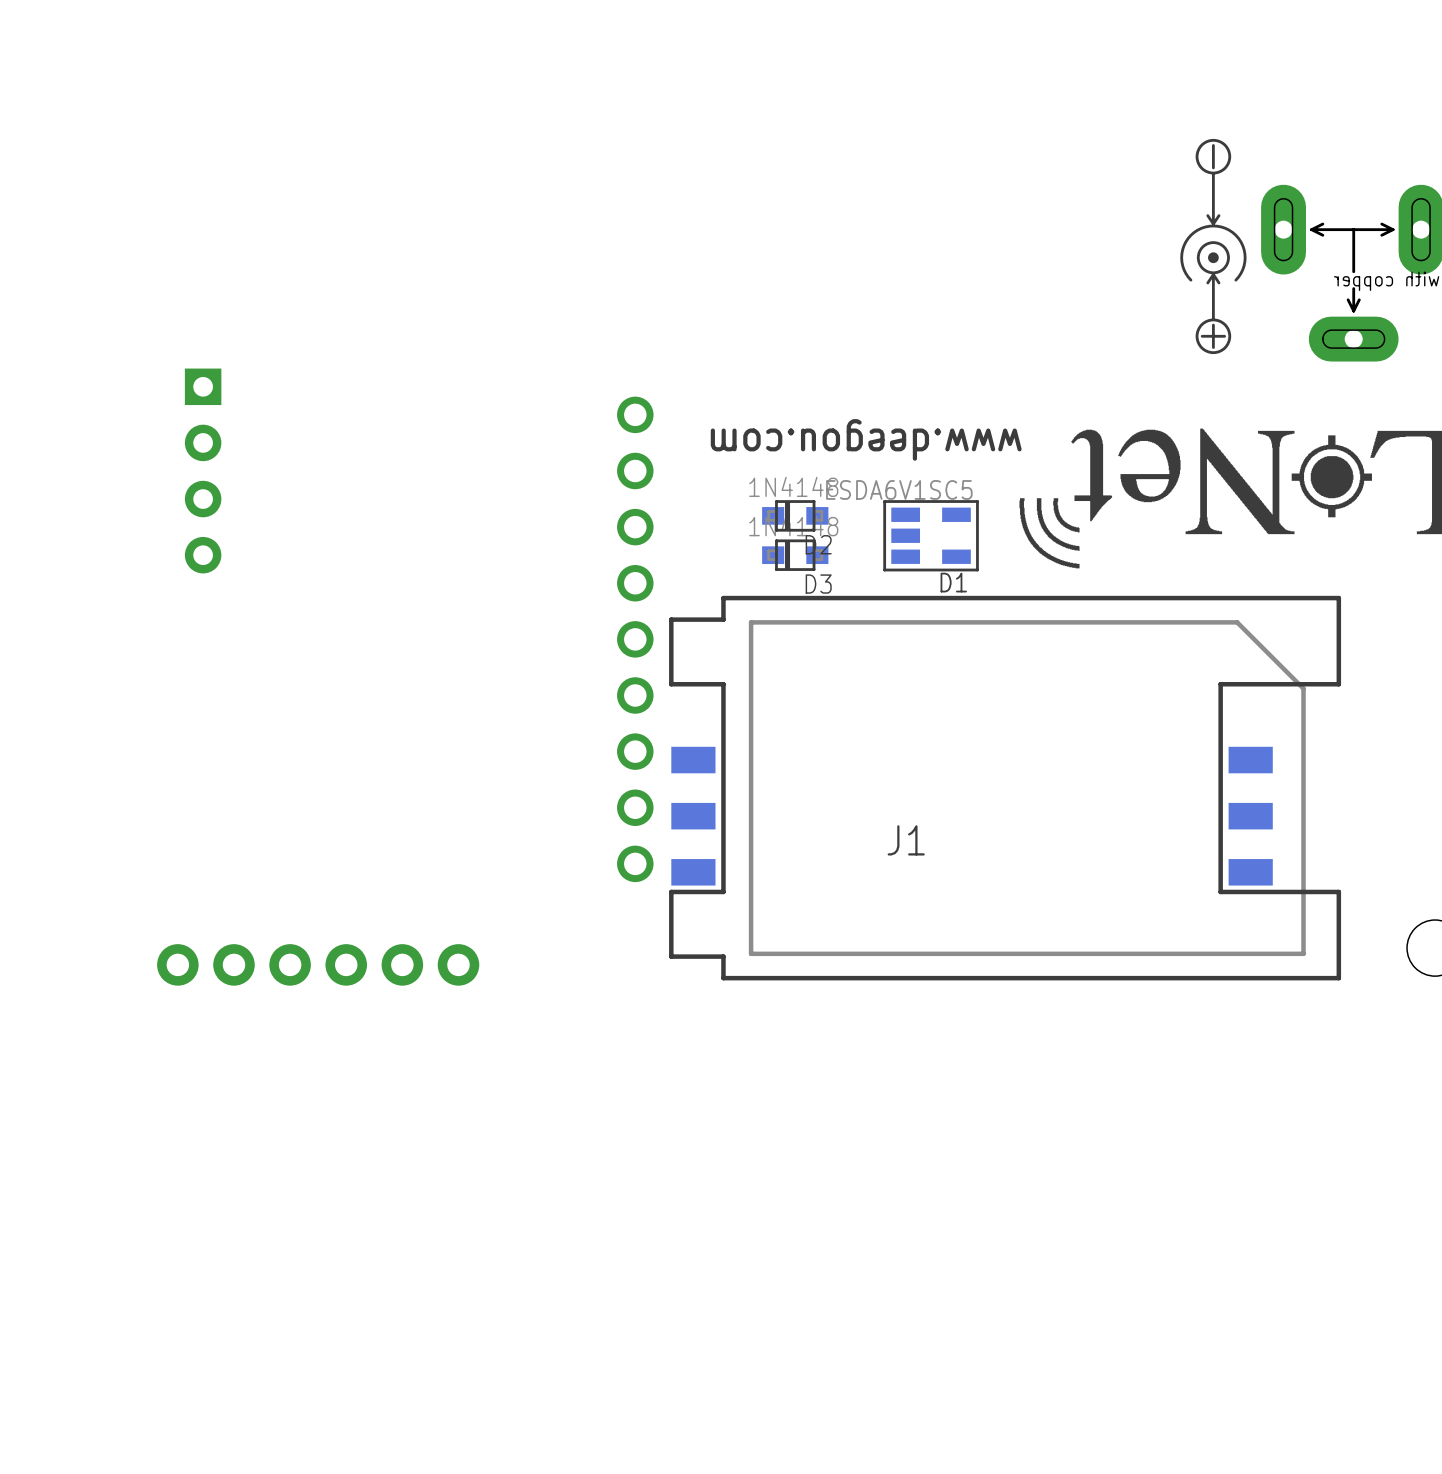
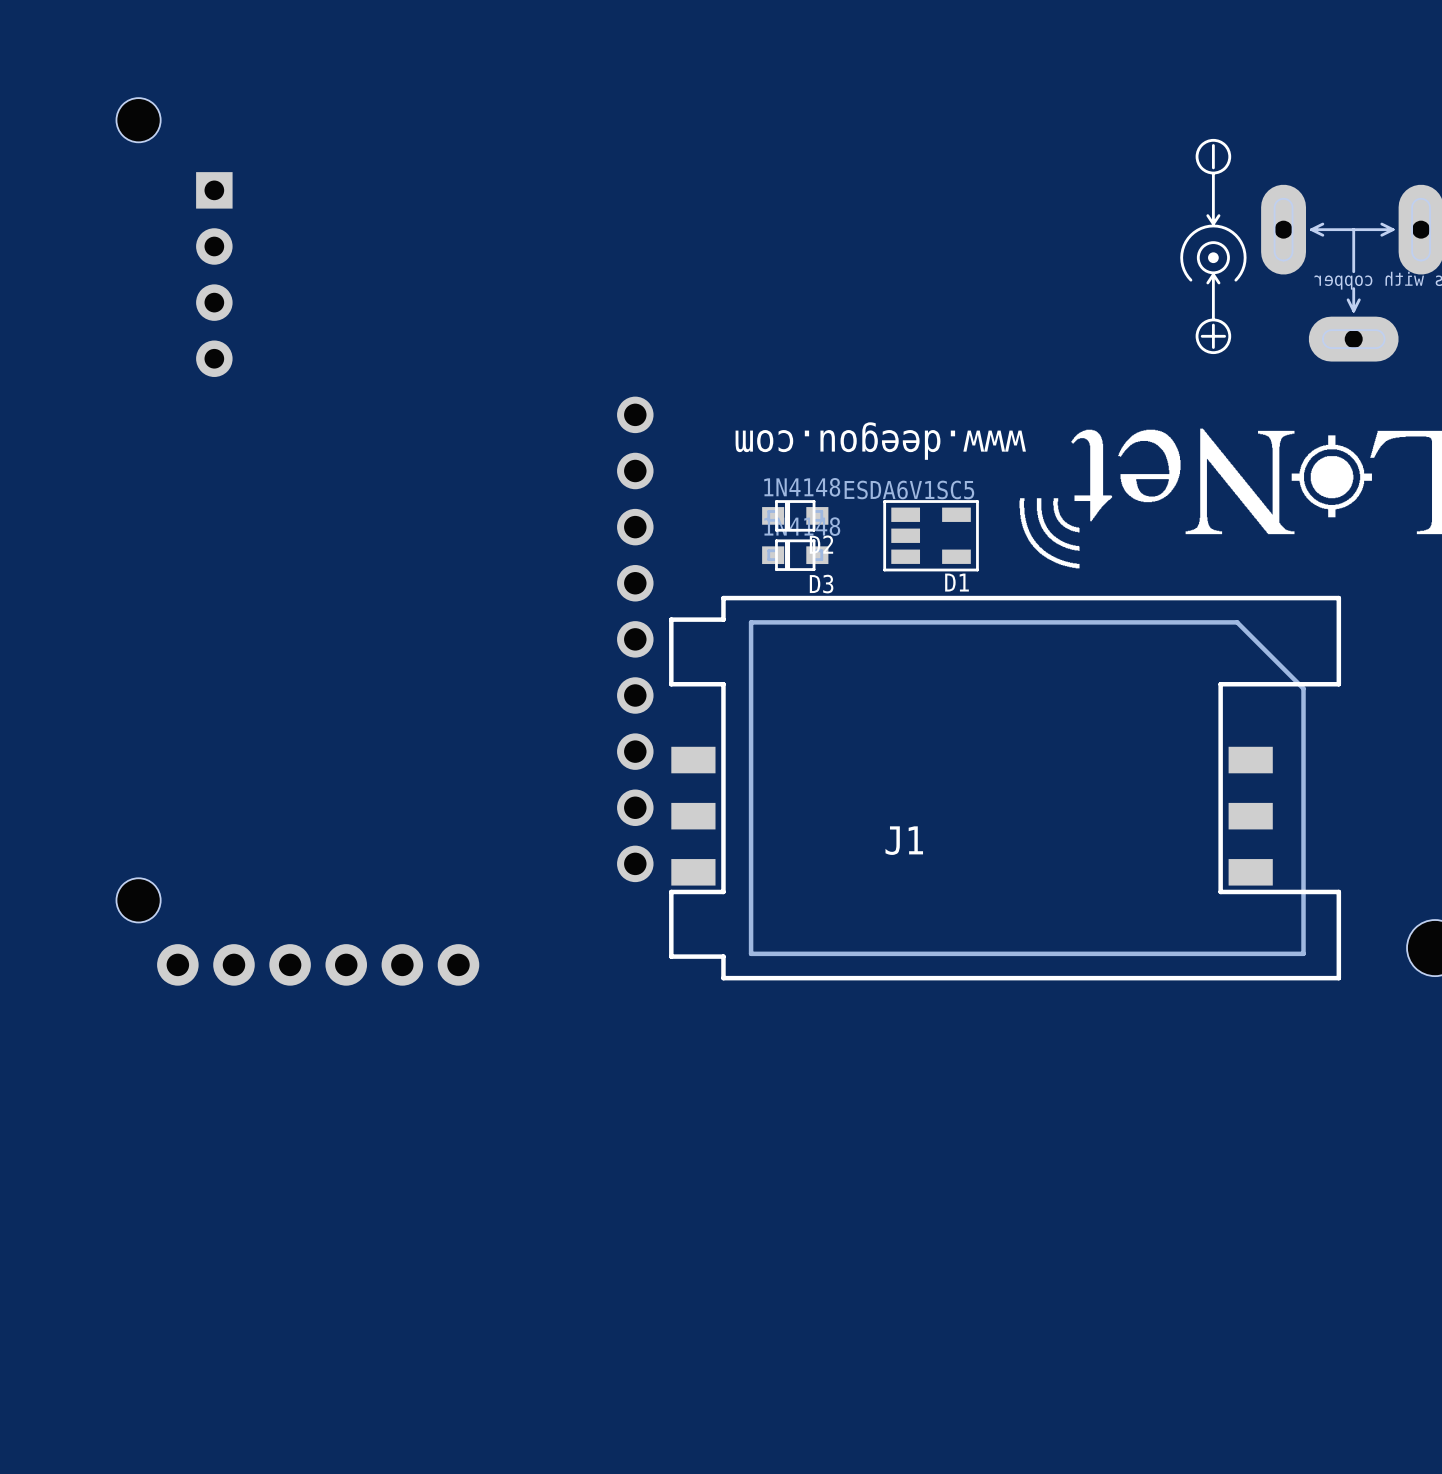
hole: none -> (138, 120)
part position: (203, 470) -> (214, 274)
hole: none -> (138, 900)

